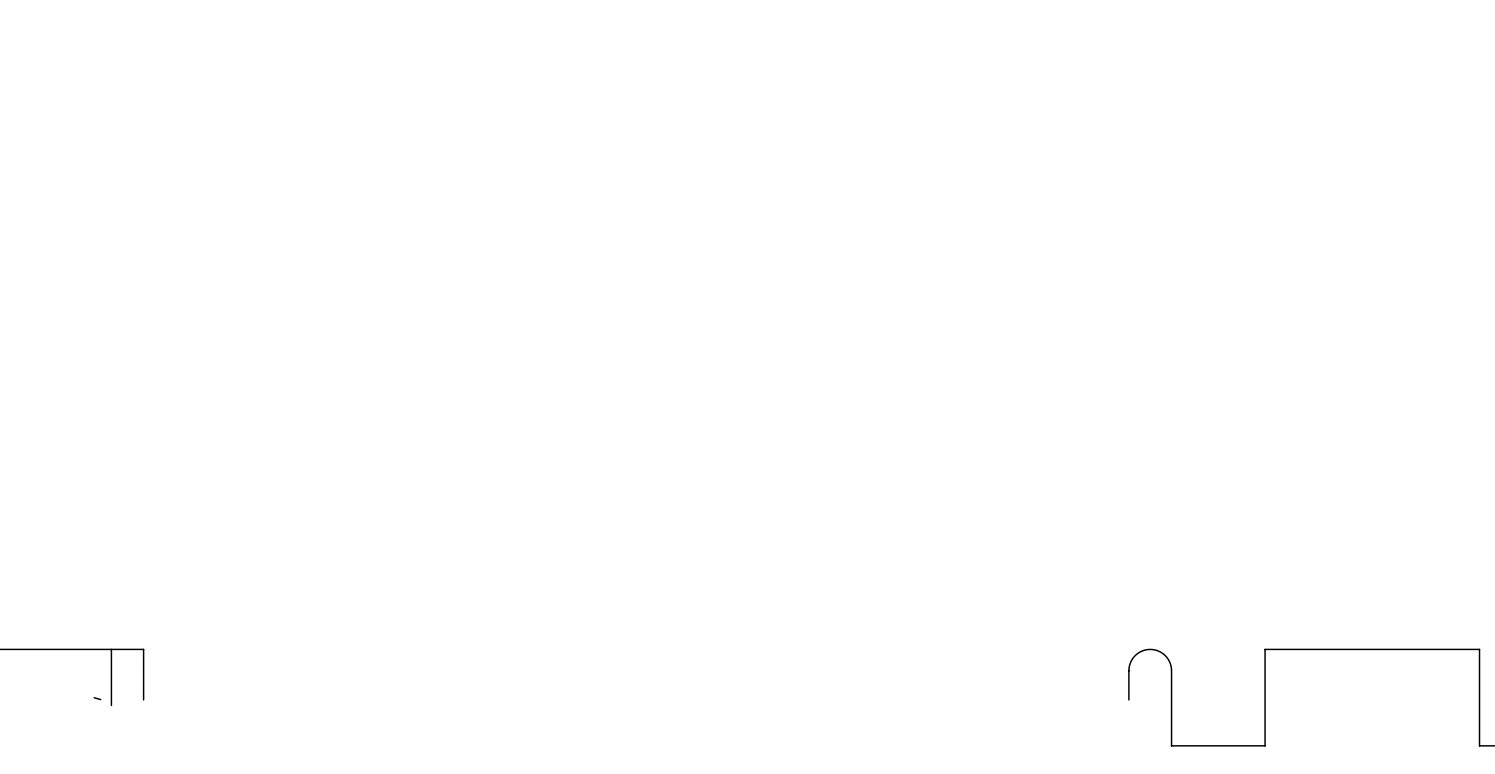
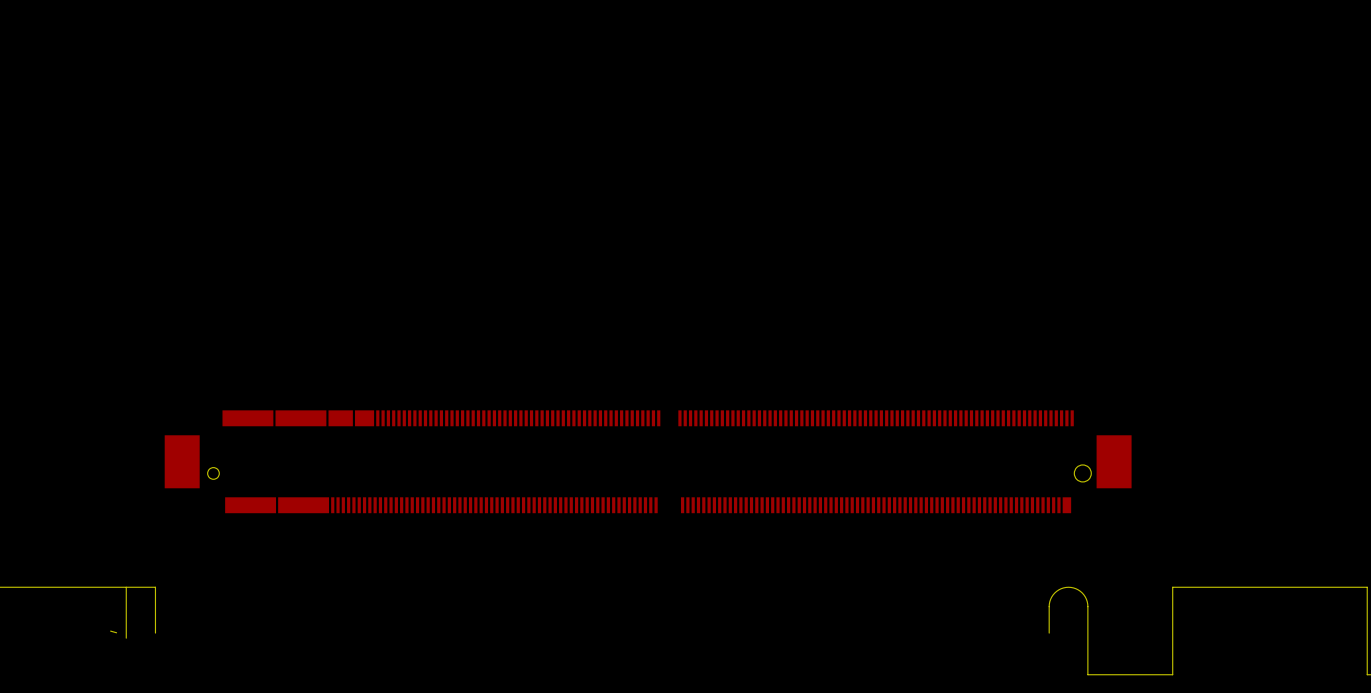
part: none -> (648, 461)

